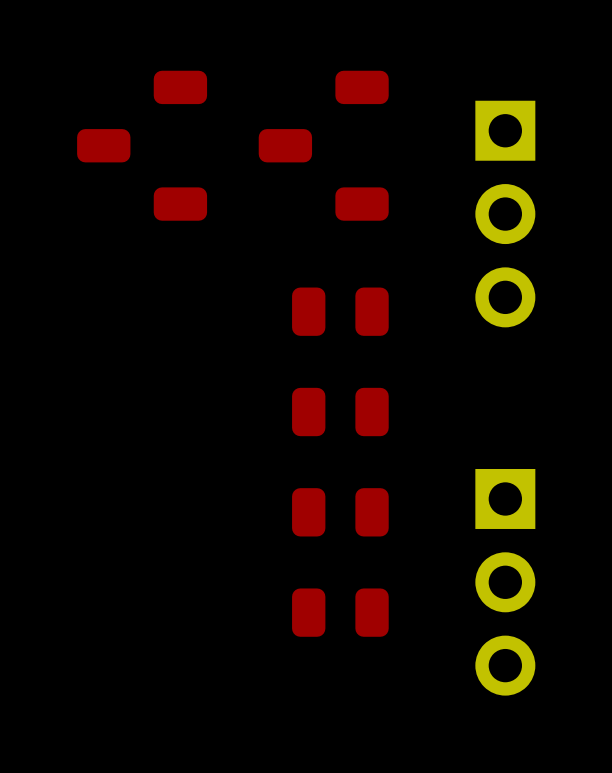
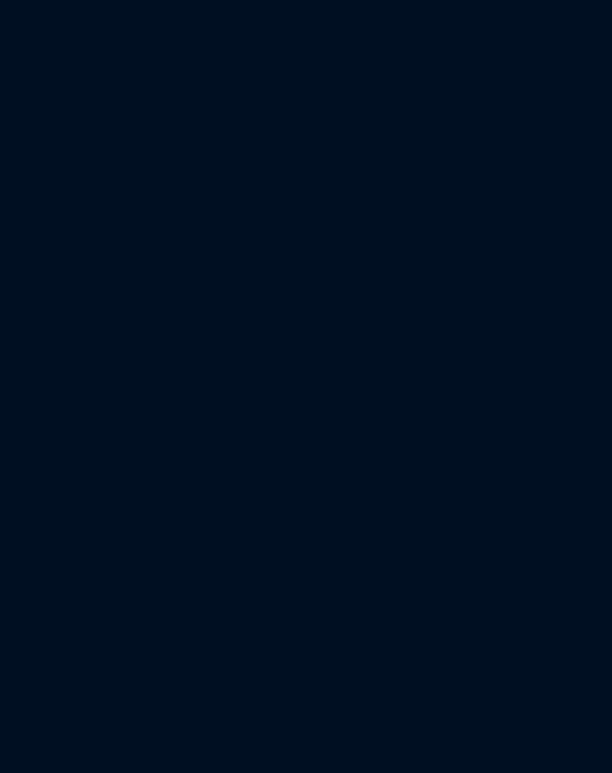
part: (142, 145) -> none
part: (323, 145) -> none
part: (505, 214) -> none
part: (340, 311) -> none
part: (340, 412) -> none
part: (340, 512) -> none
part: (505, 582) -> none
part: (340, 612) -> none

